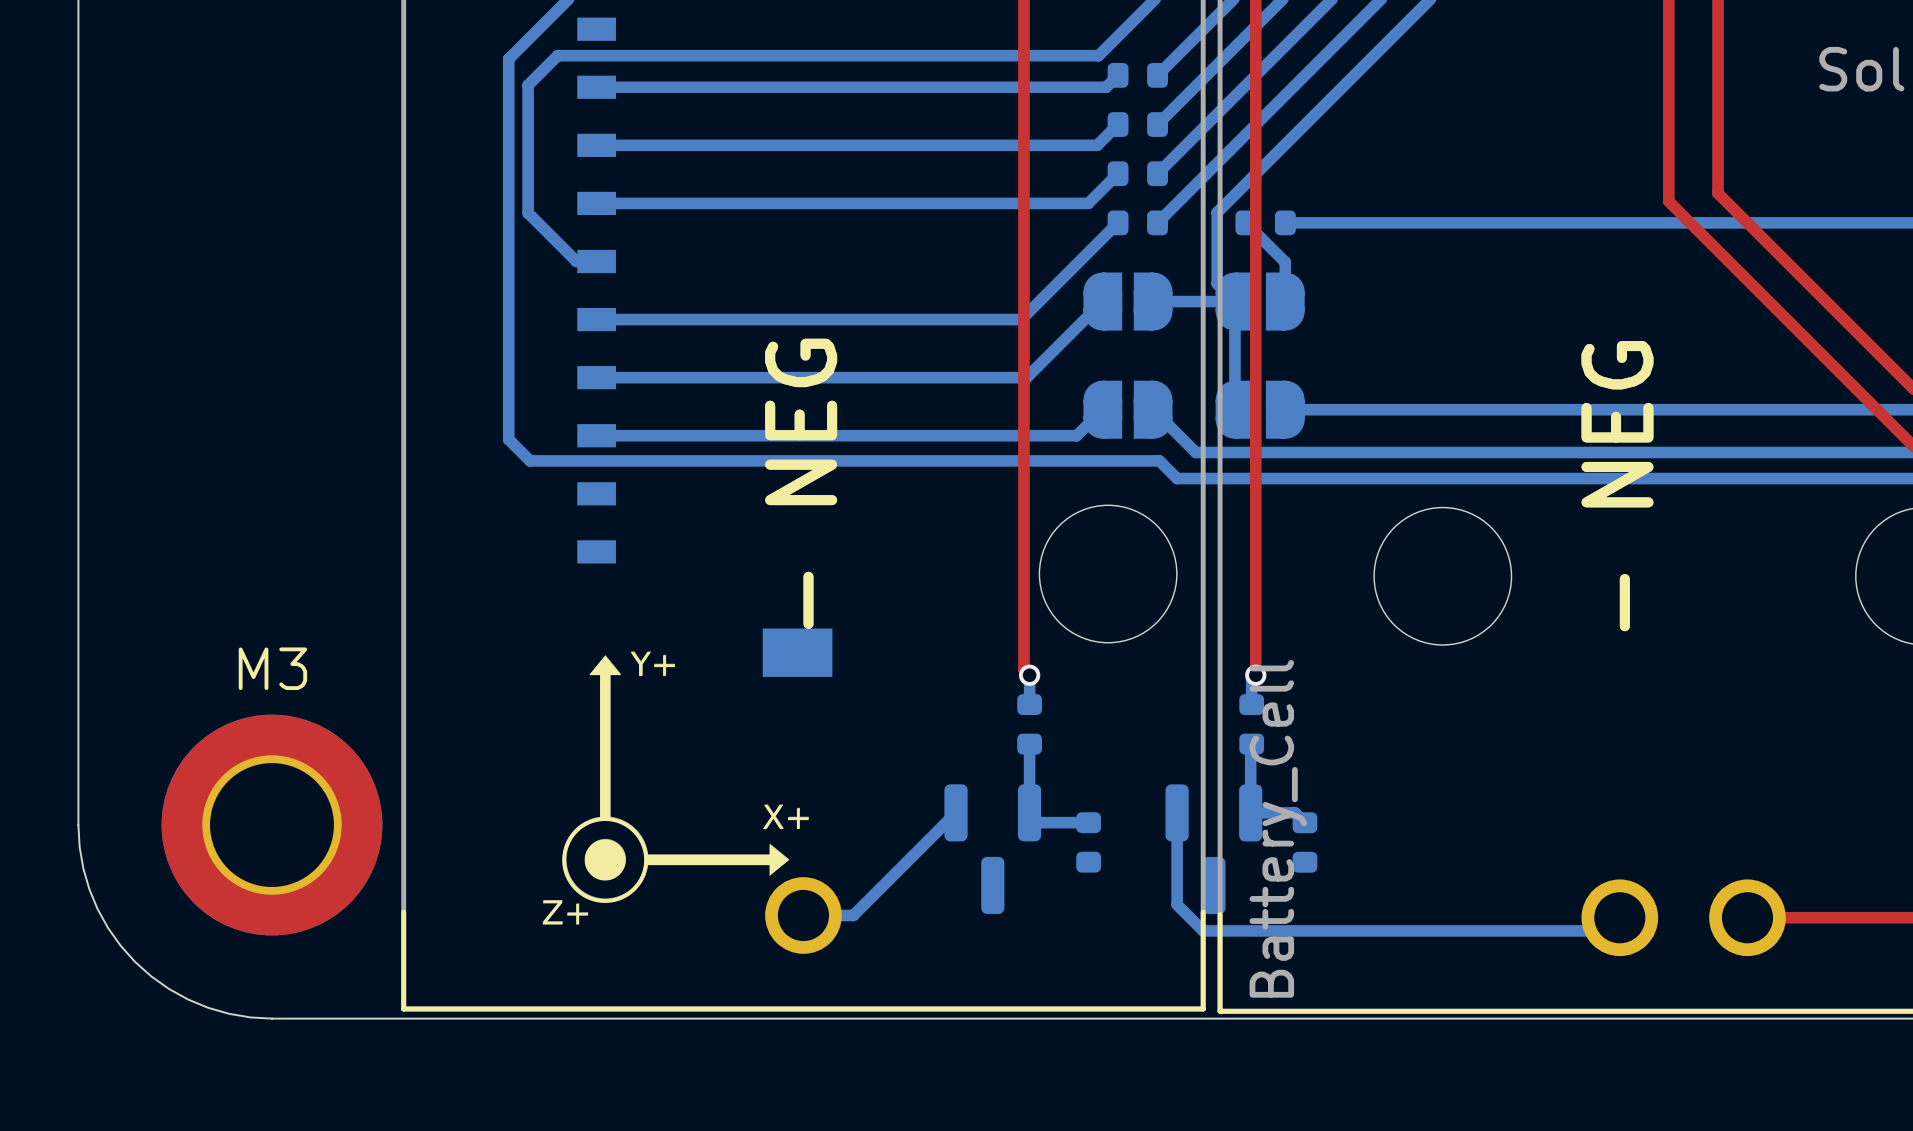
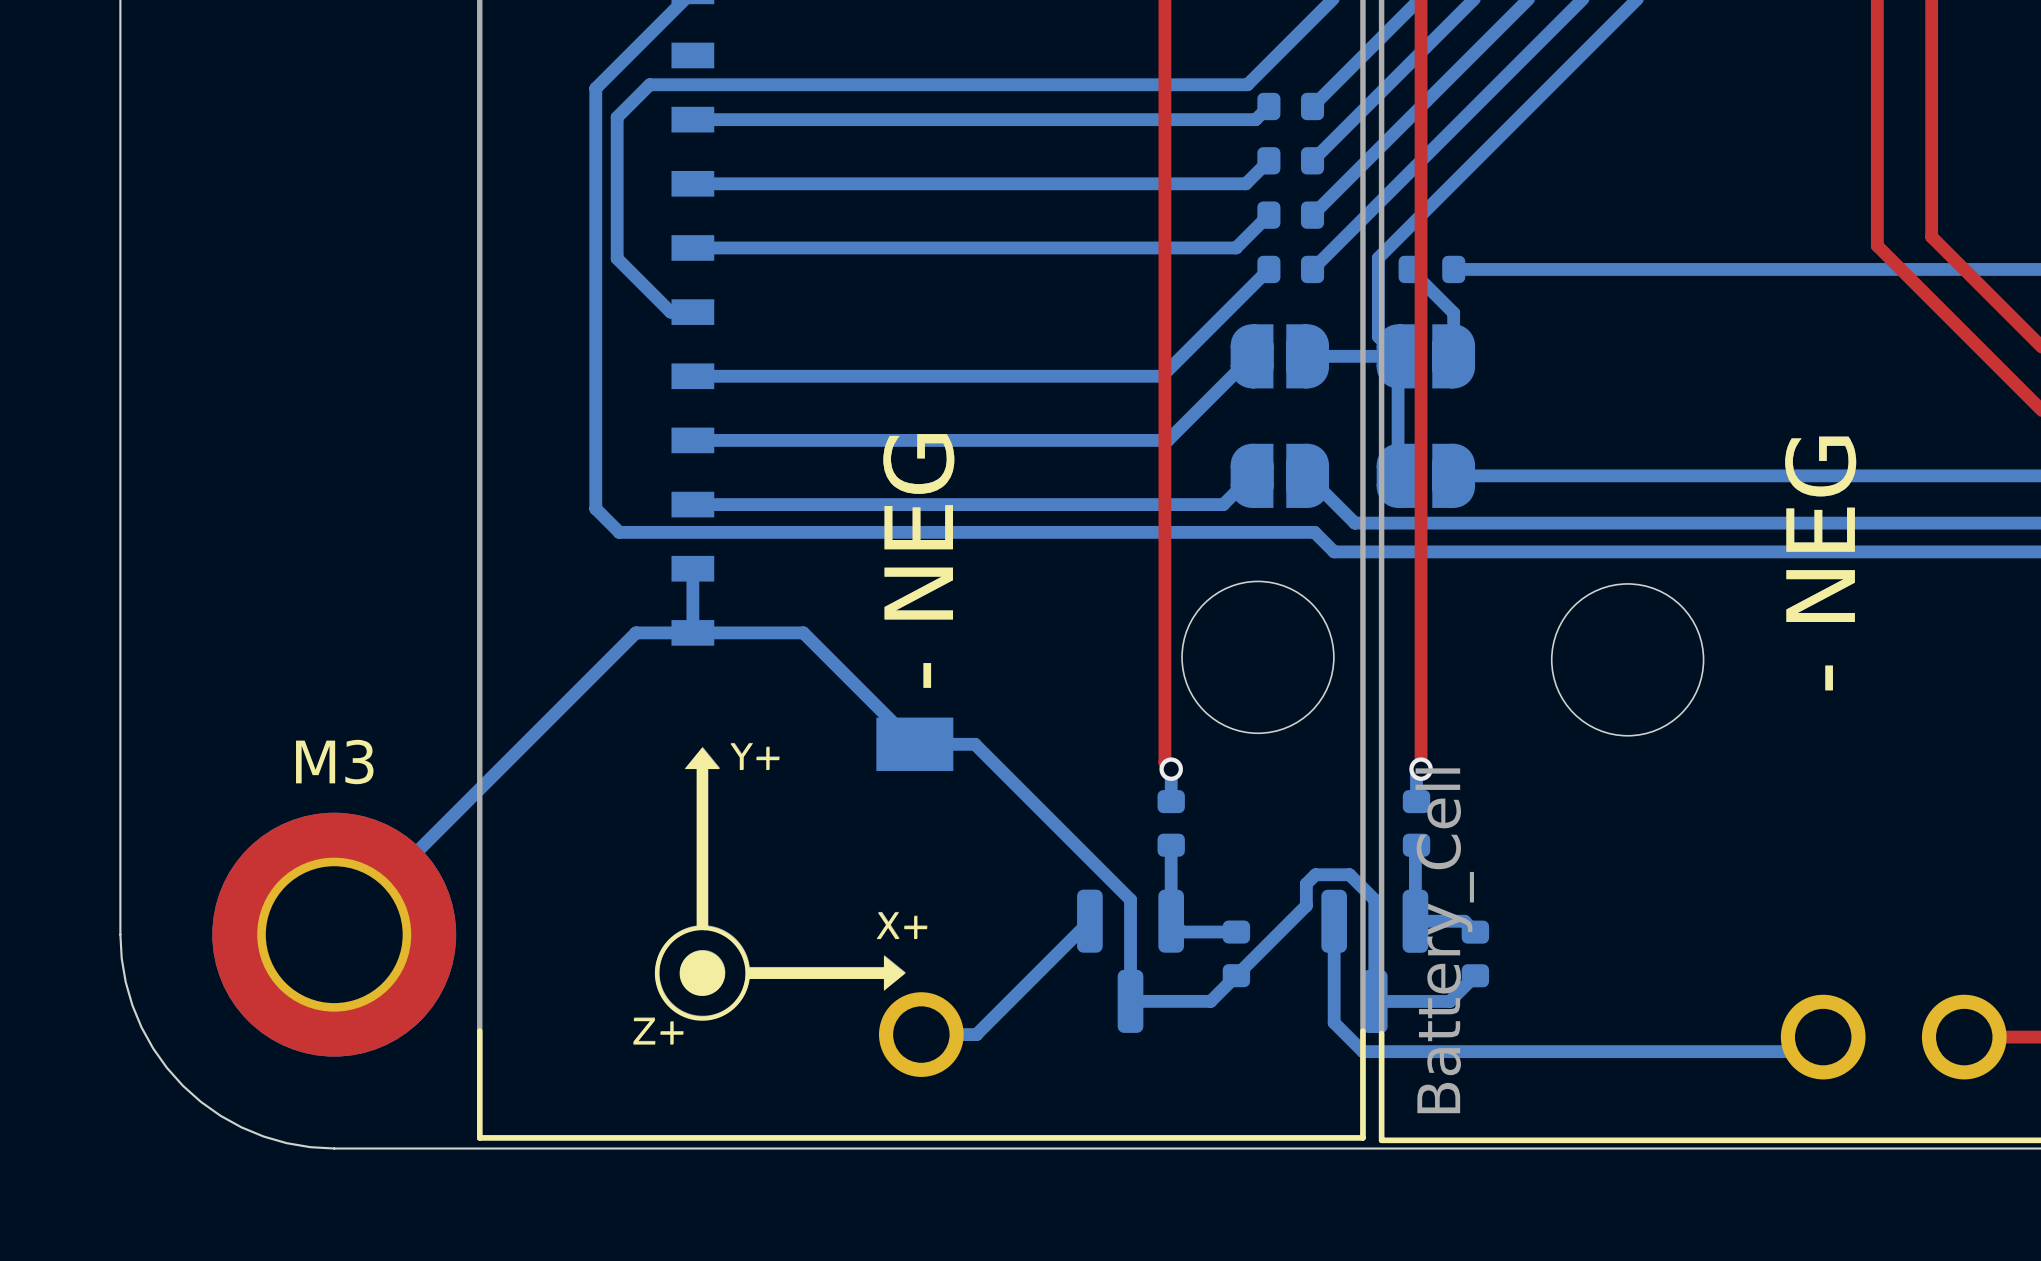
bottom track: none -> (692, 568) (692, 632)
bottom track: none -> (334, 934) (636, 632) (803, 632) (914, 744) (975, 744) (1130, 899) (1130, 1001) (1210, 1001) (1306, 905) (1306, 883) (1315, 874) (1349, 874) (1374, 899) (1374, 1001) (1449, 1001) (1475, 975)

